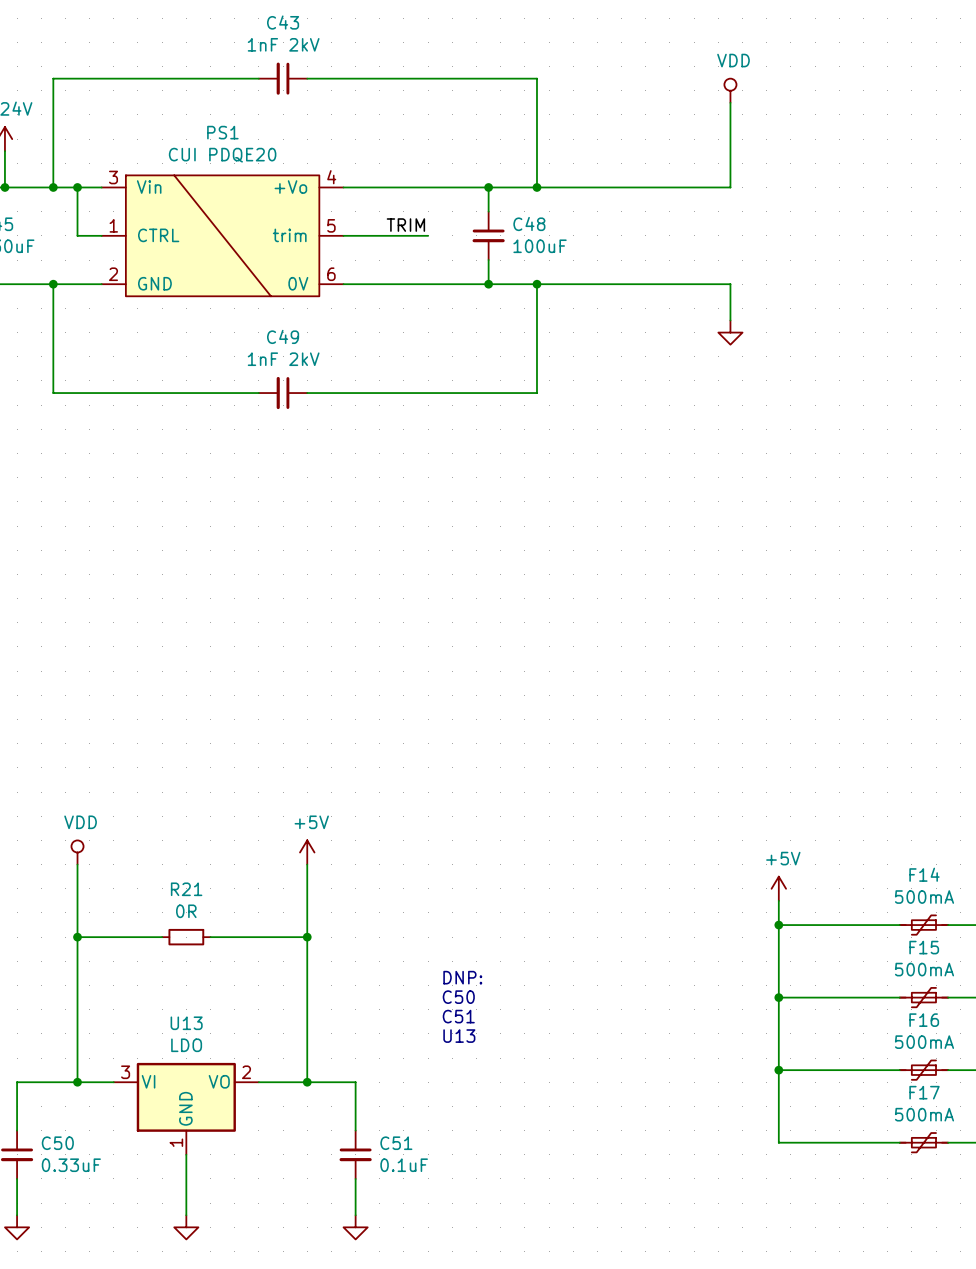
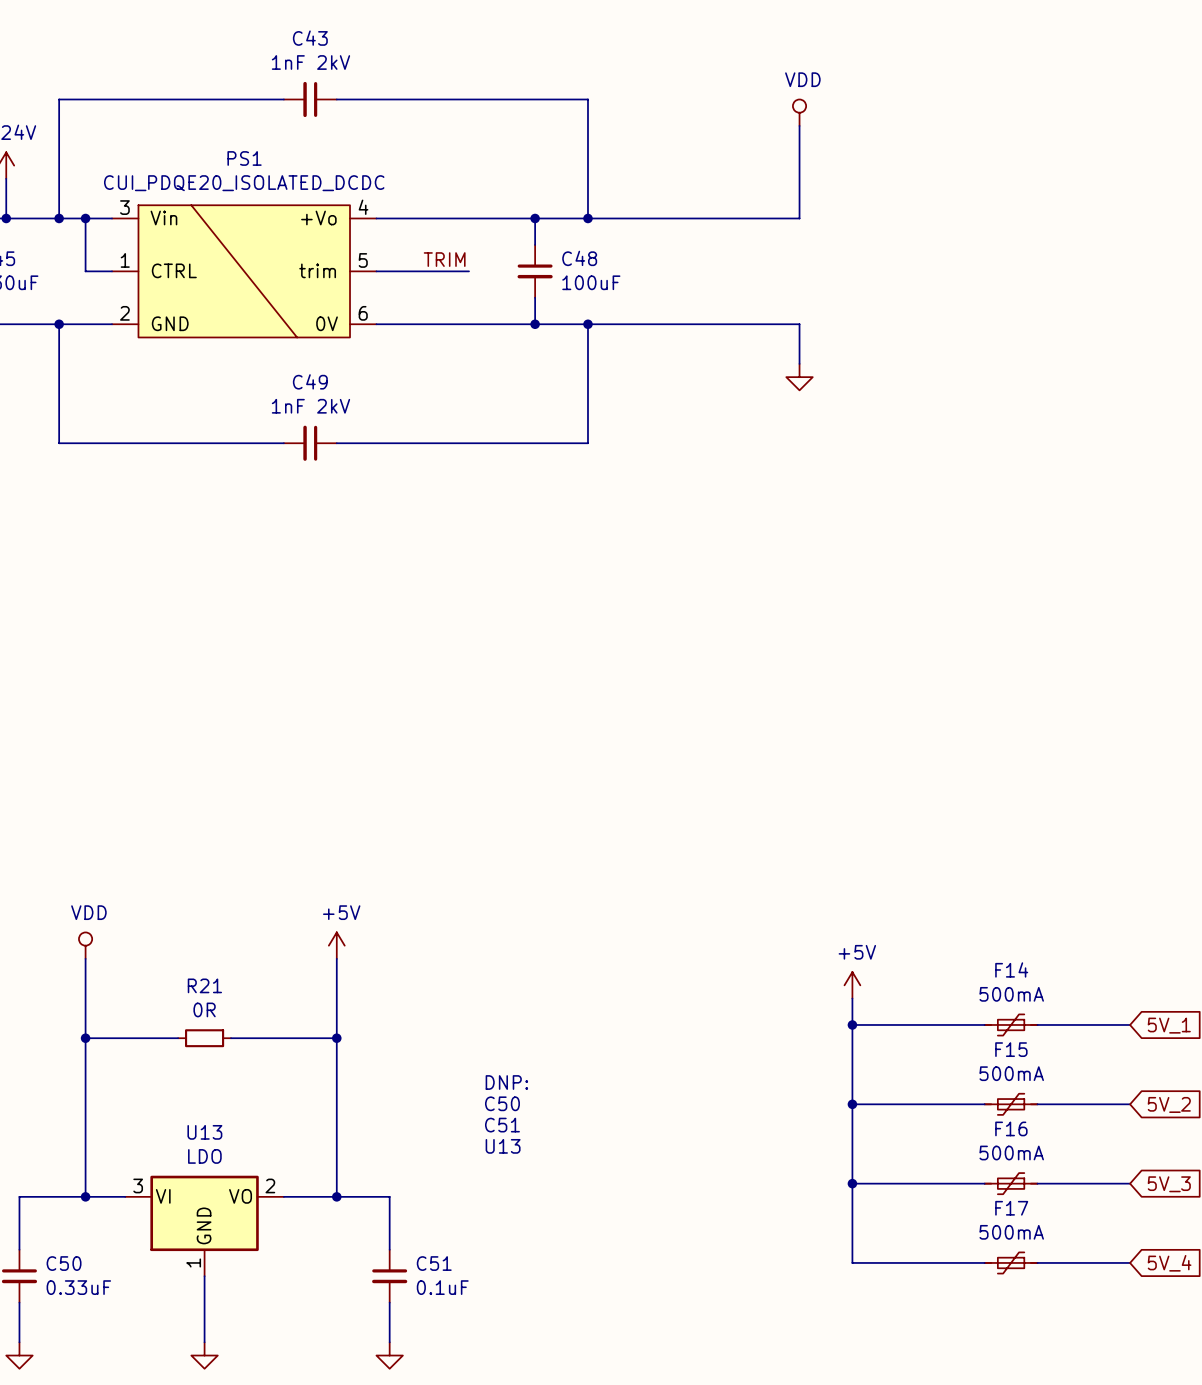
PS1 value: CUI PDQE20 (222, 155) -> CUI_PDQE20_ISOLATED_DCDC (244, 183)

